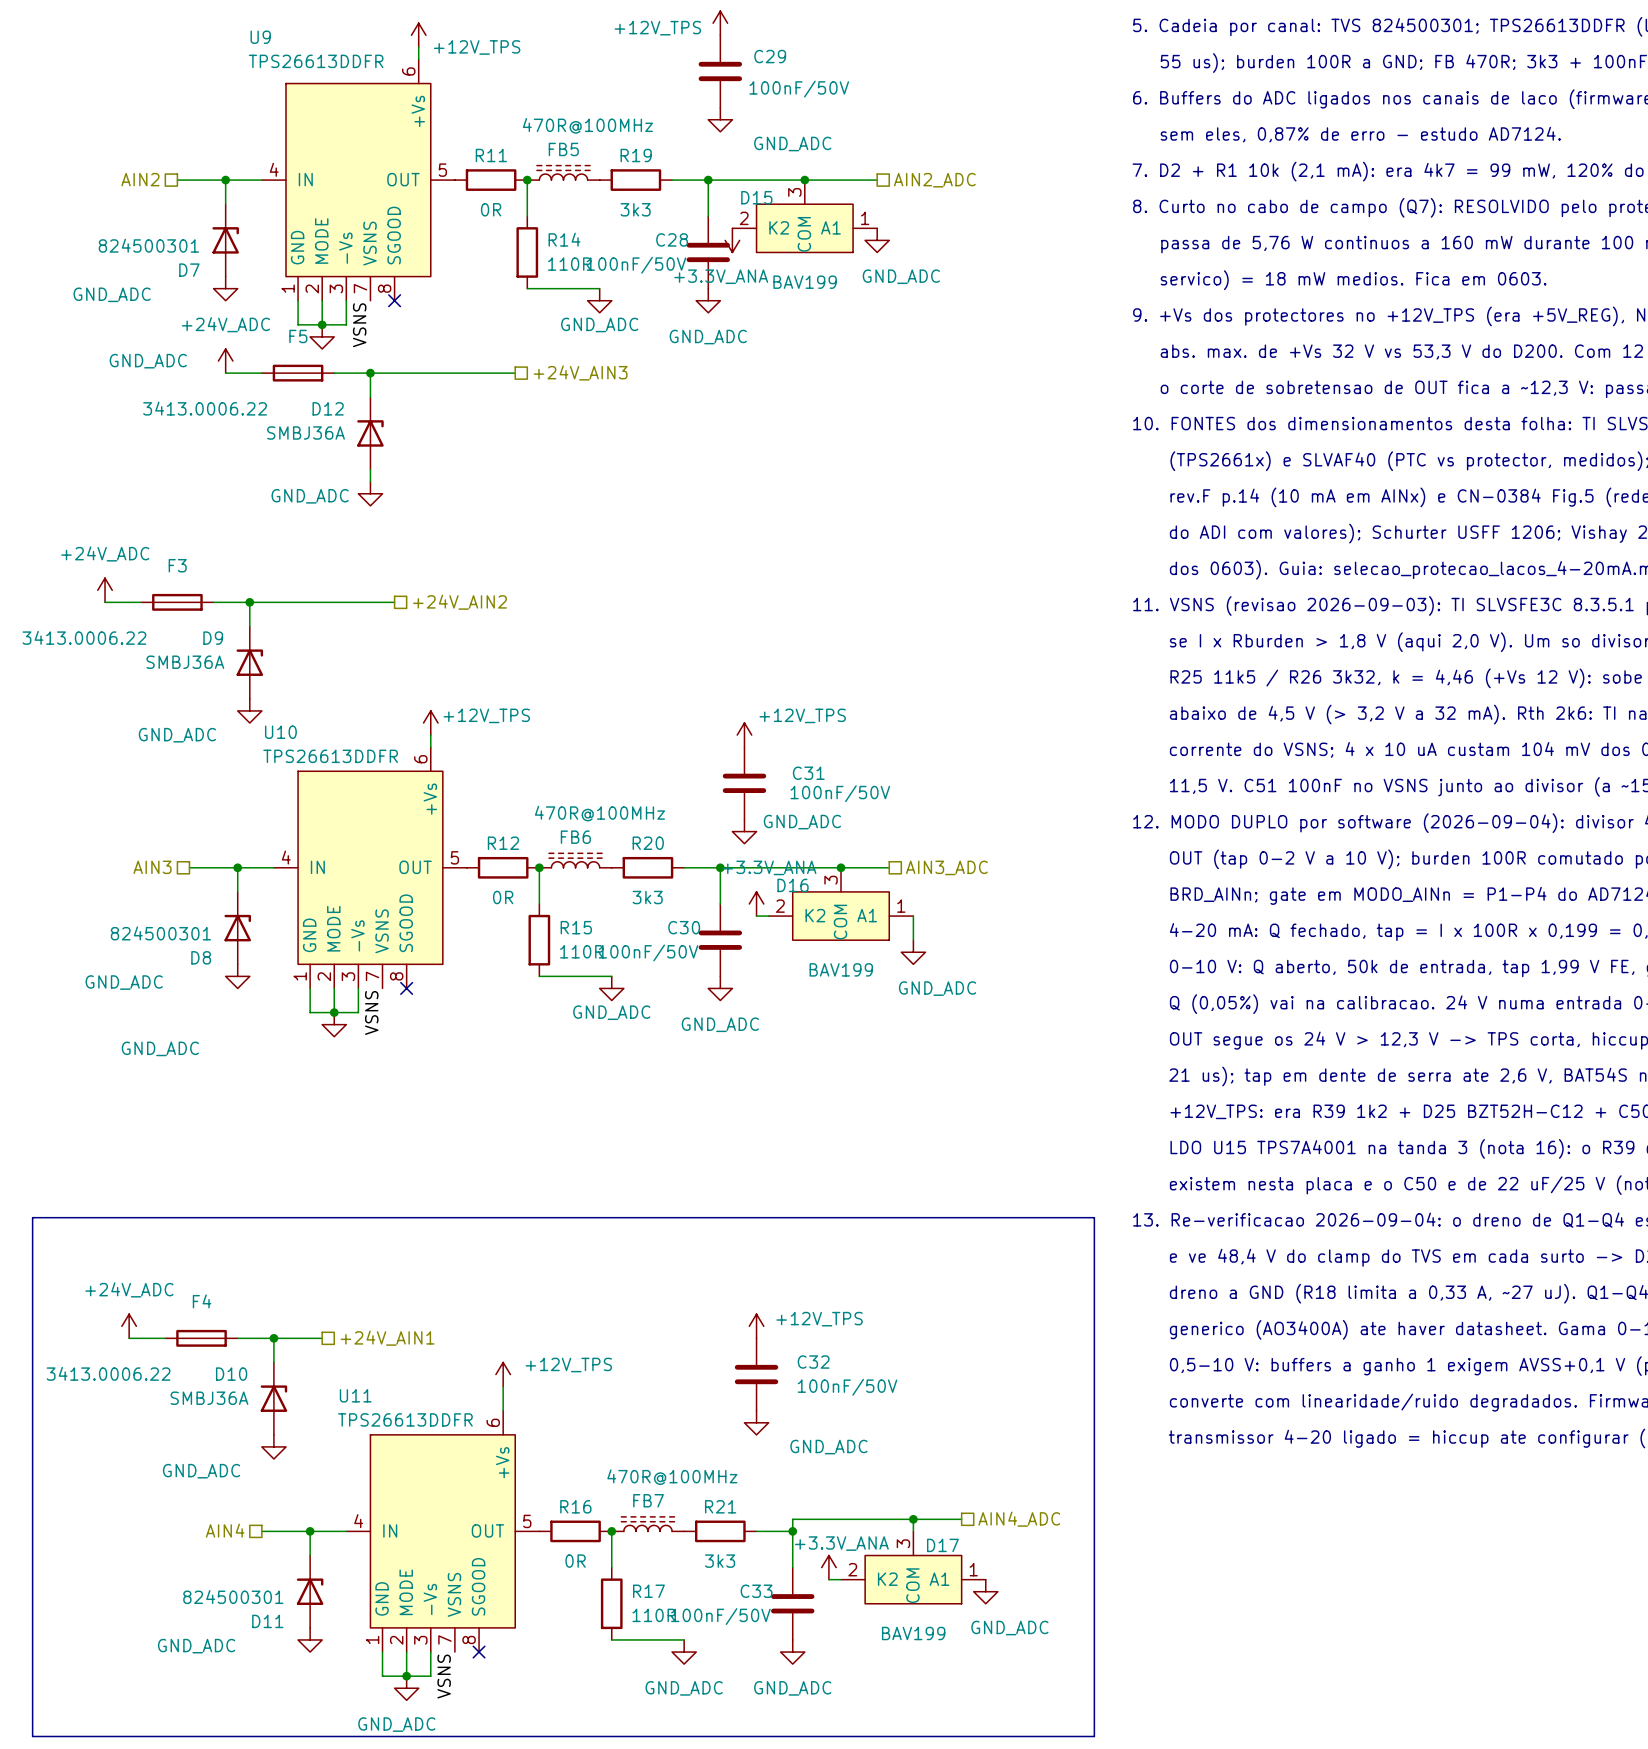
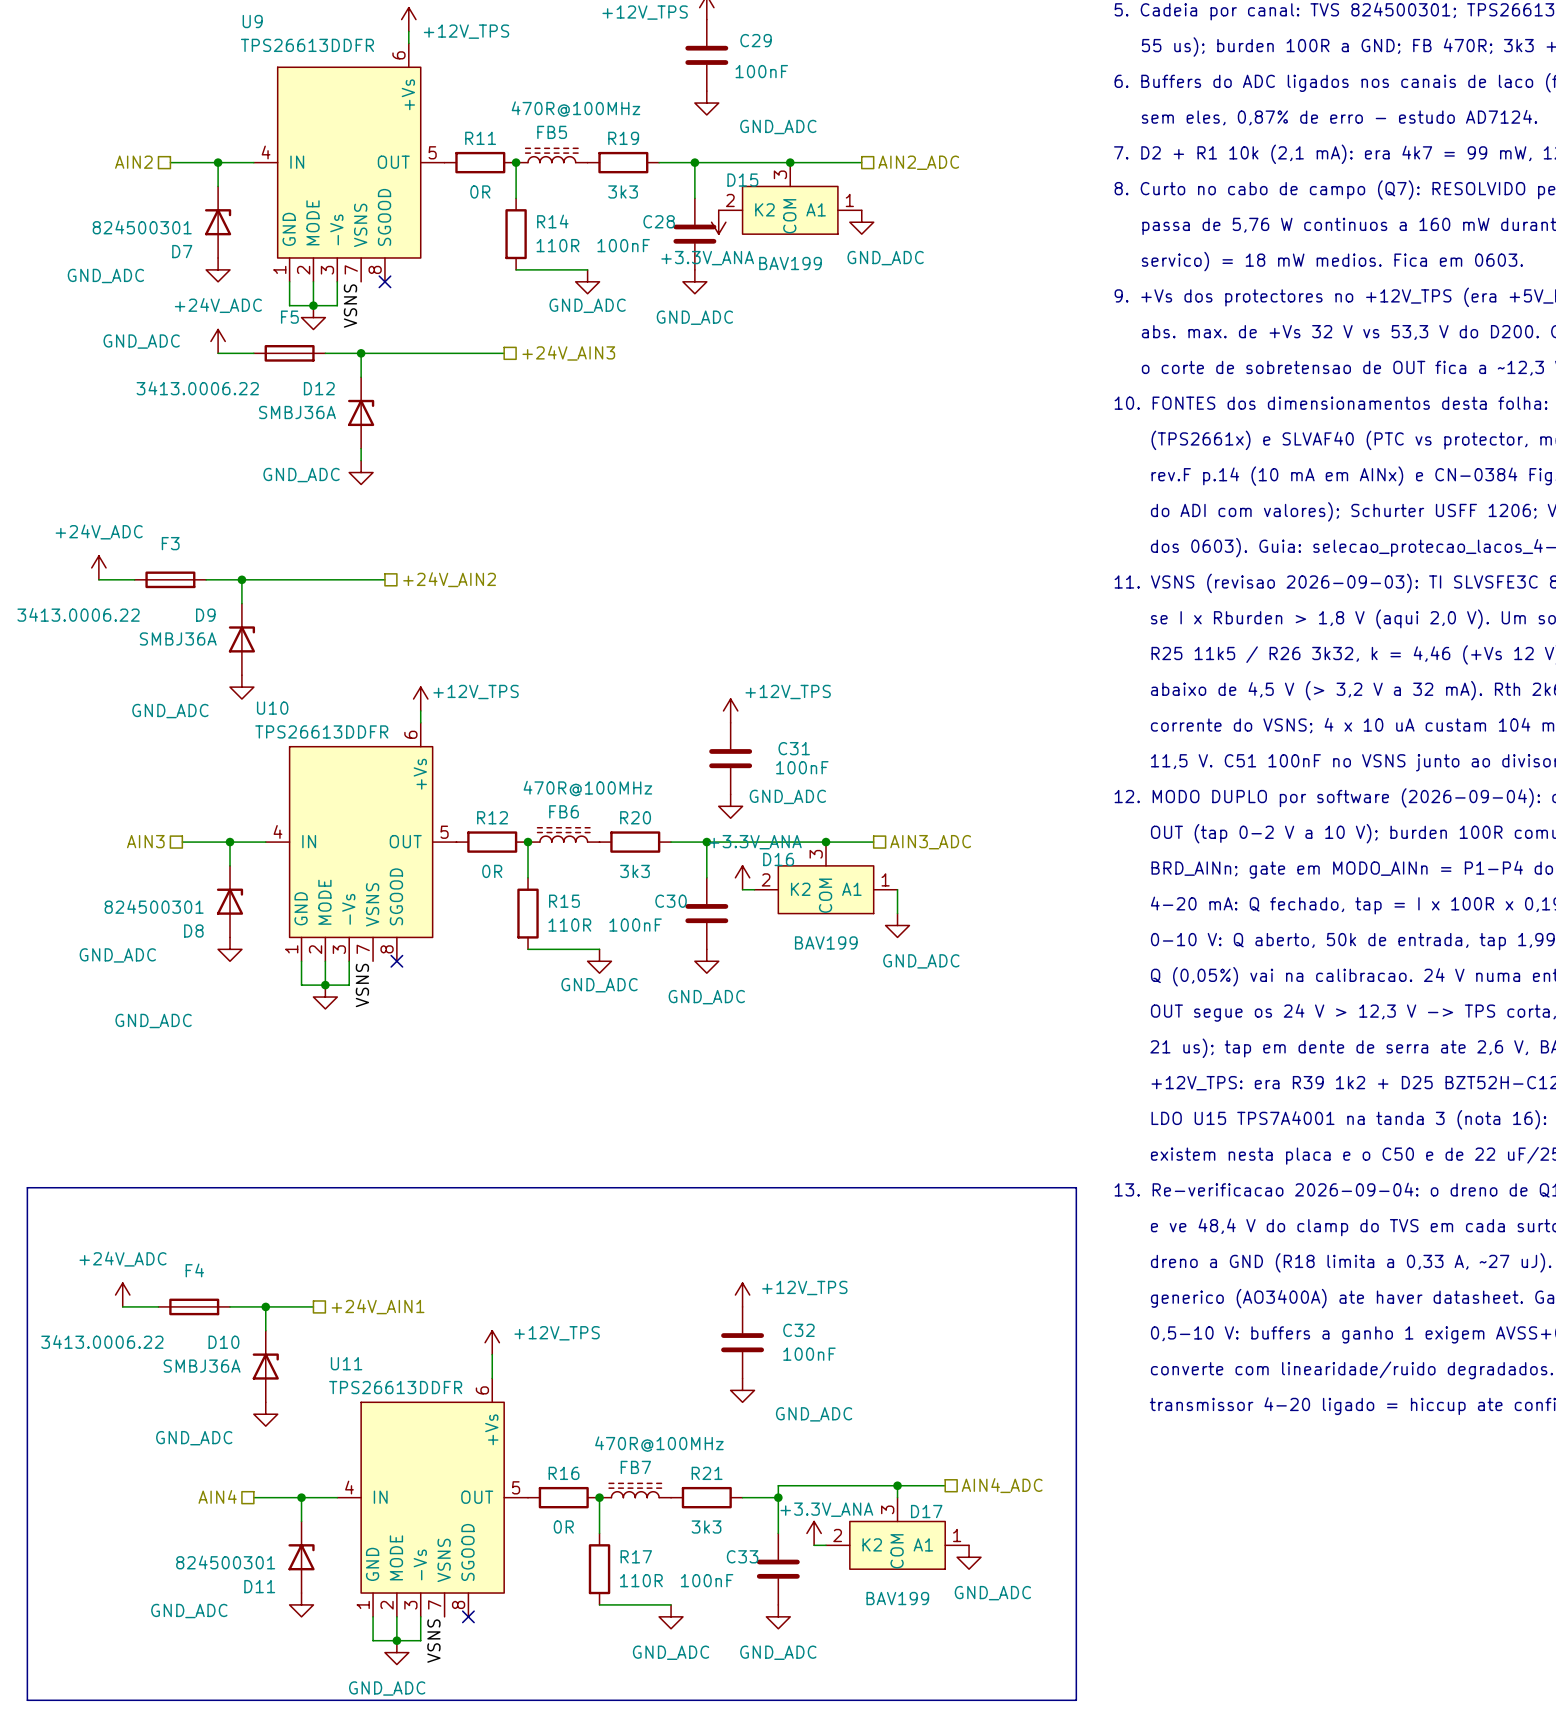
C29 value: 100nF/50V (799, 89) -> 100nF (761, 71)
C28 value: 100nF/50V (636, 265) -> 100nF (623, 245)
C31 value: 100nF/50V (840, 793) -> 100nF (802, 767)
C30 value: 100nF/50V (648, 952) -> 100nF (635, 925)
C32 value: 100nF/50V (847, 1387) -> 100nF (809, 1354)
C33 value: 100nF/50V (720, 1616) -> 100nF (707, 1580)

